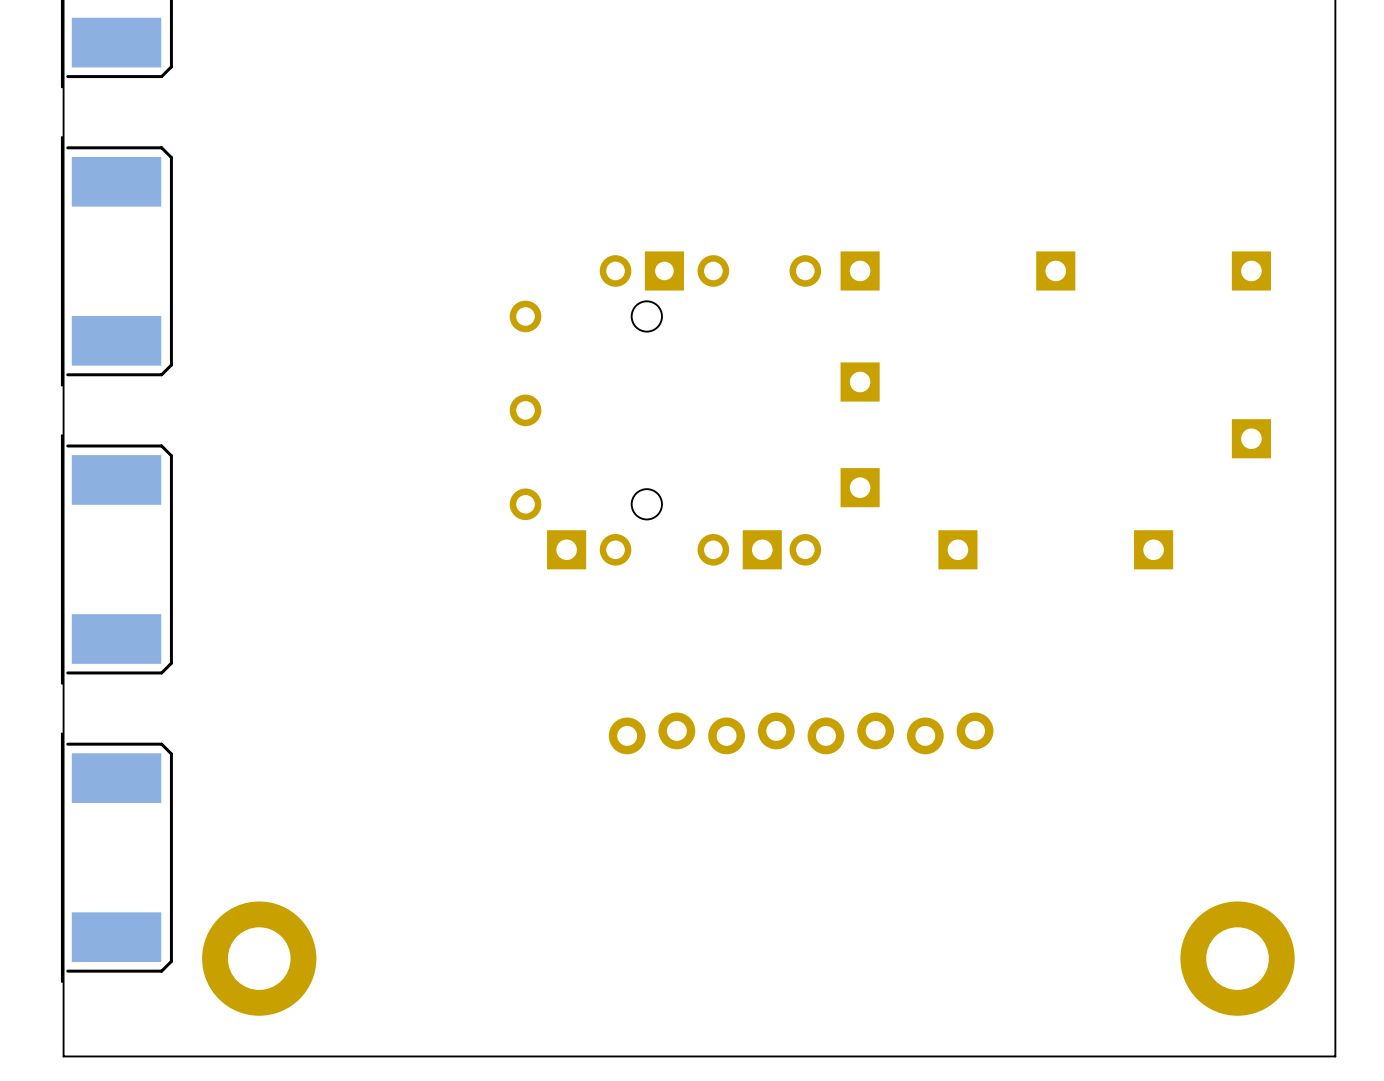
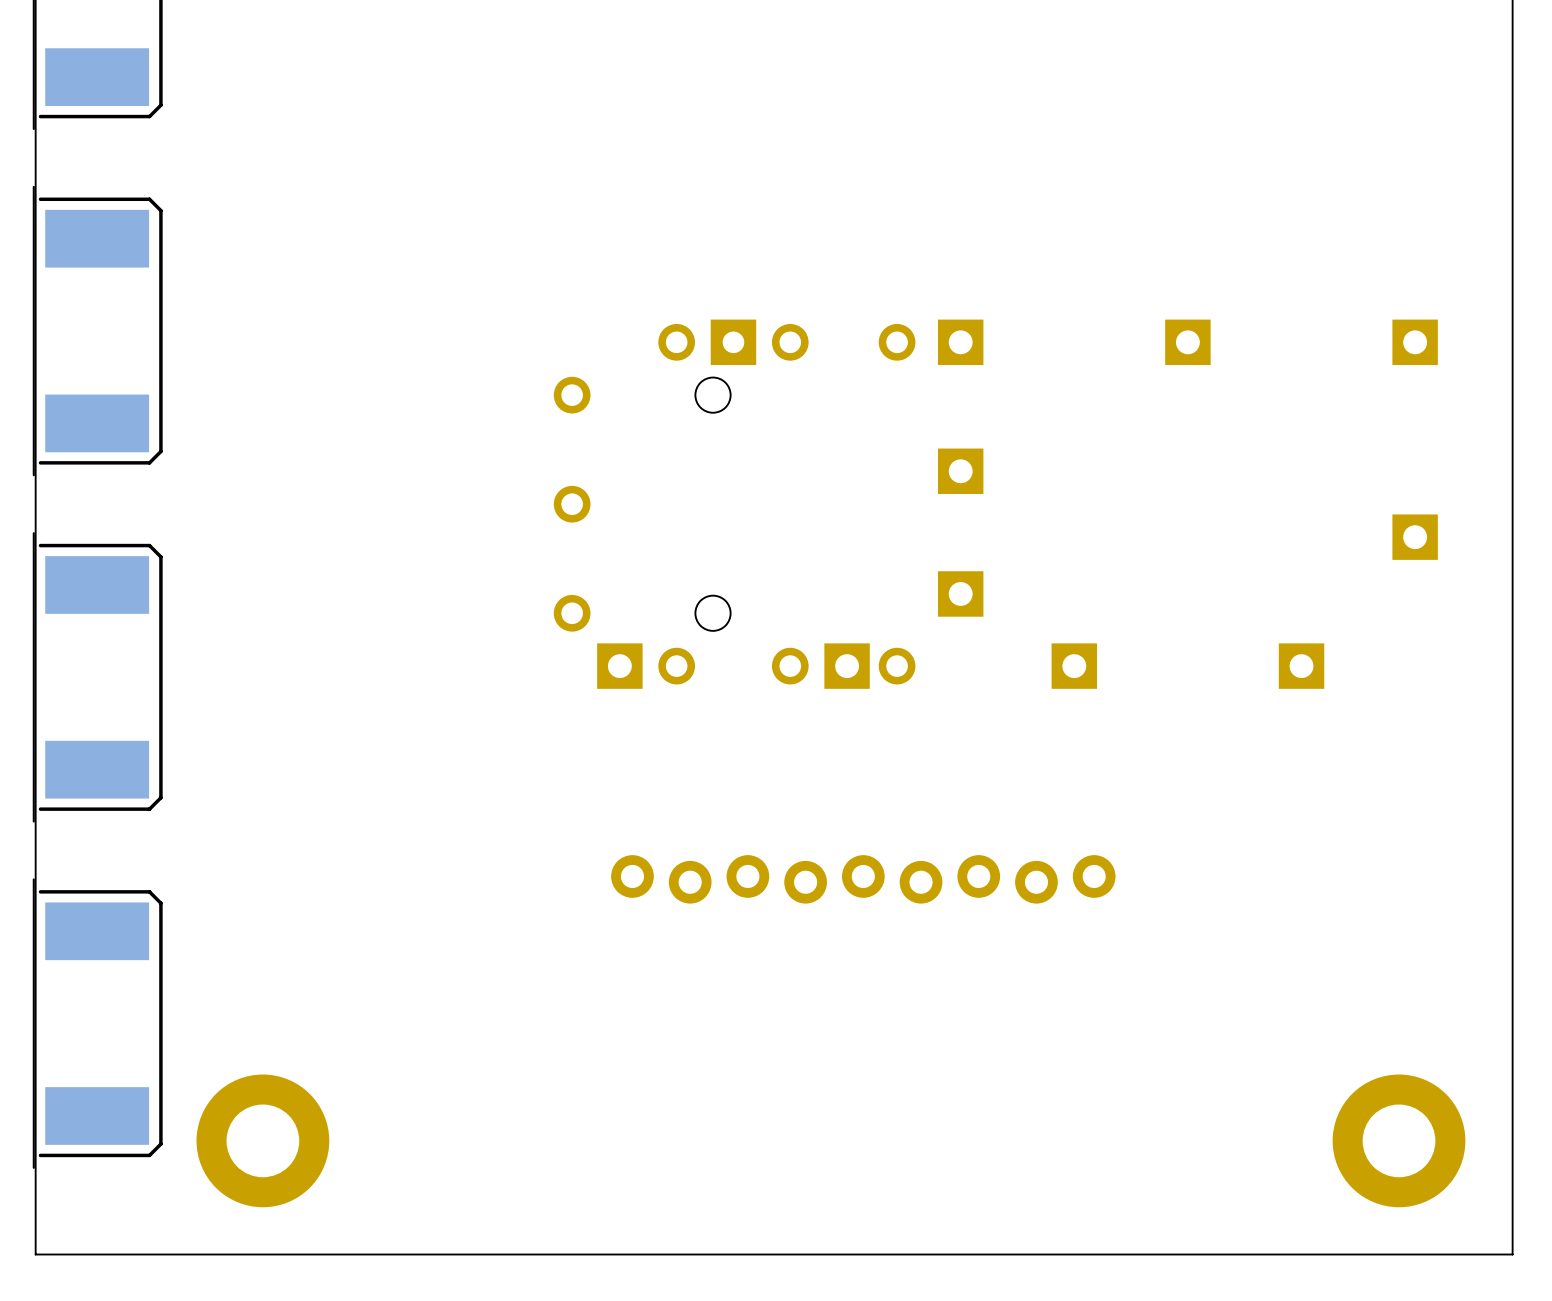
part: none -> (747, 879)

